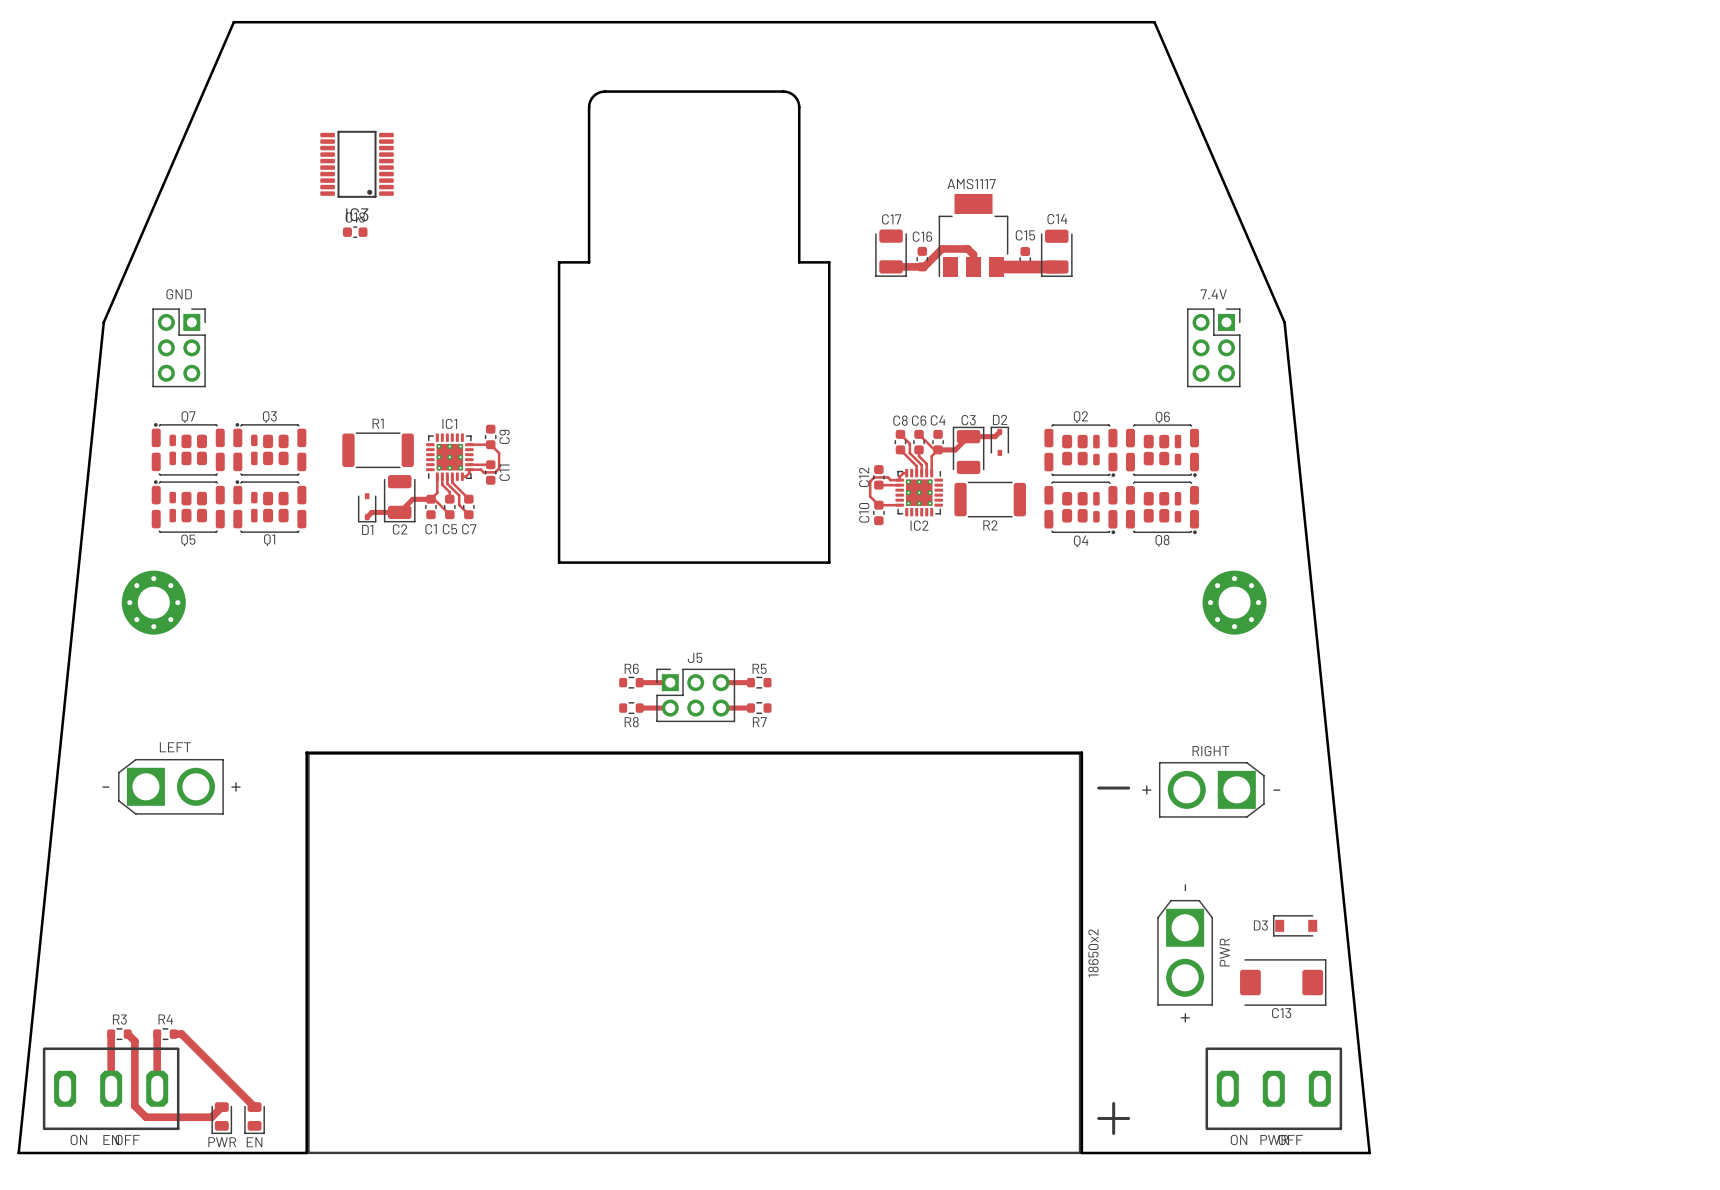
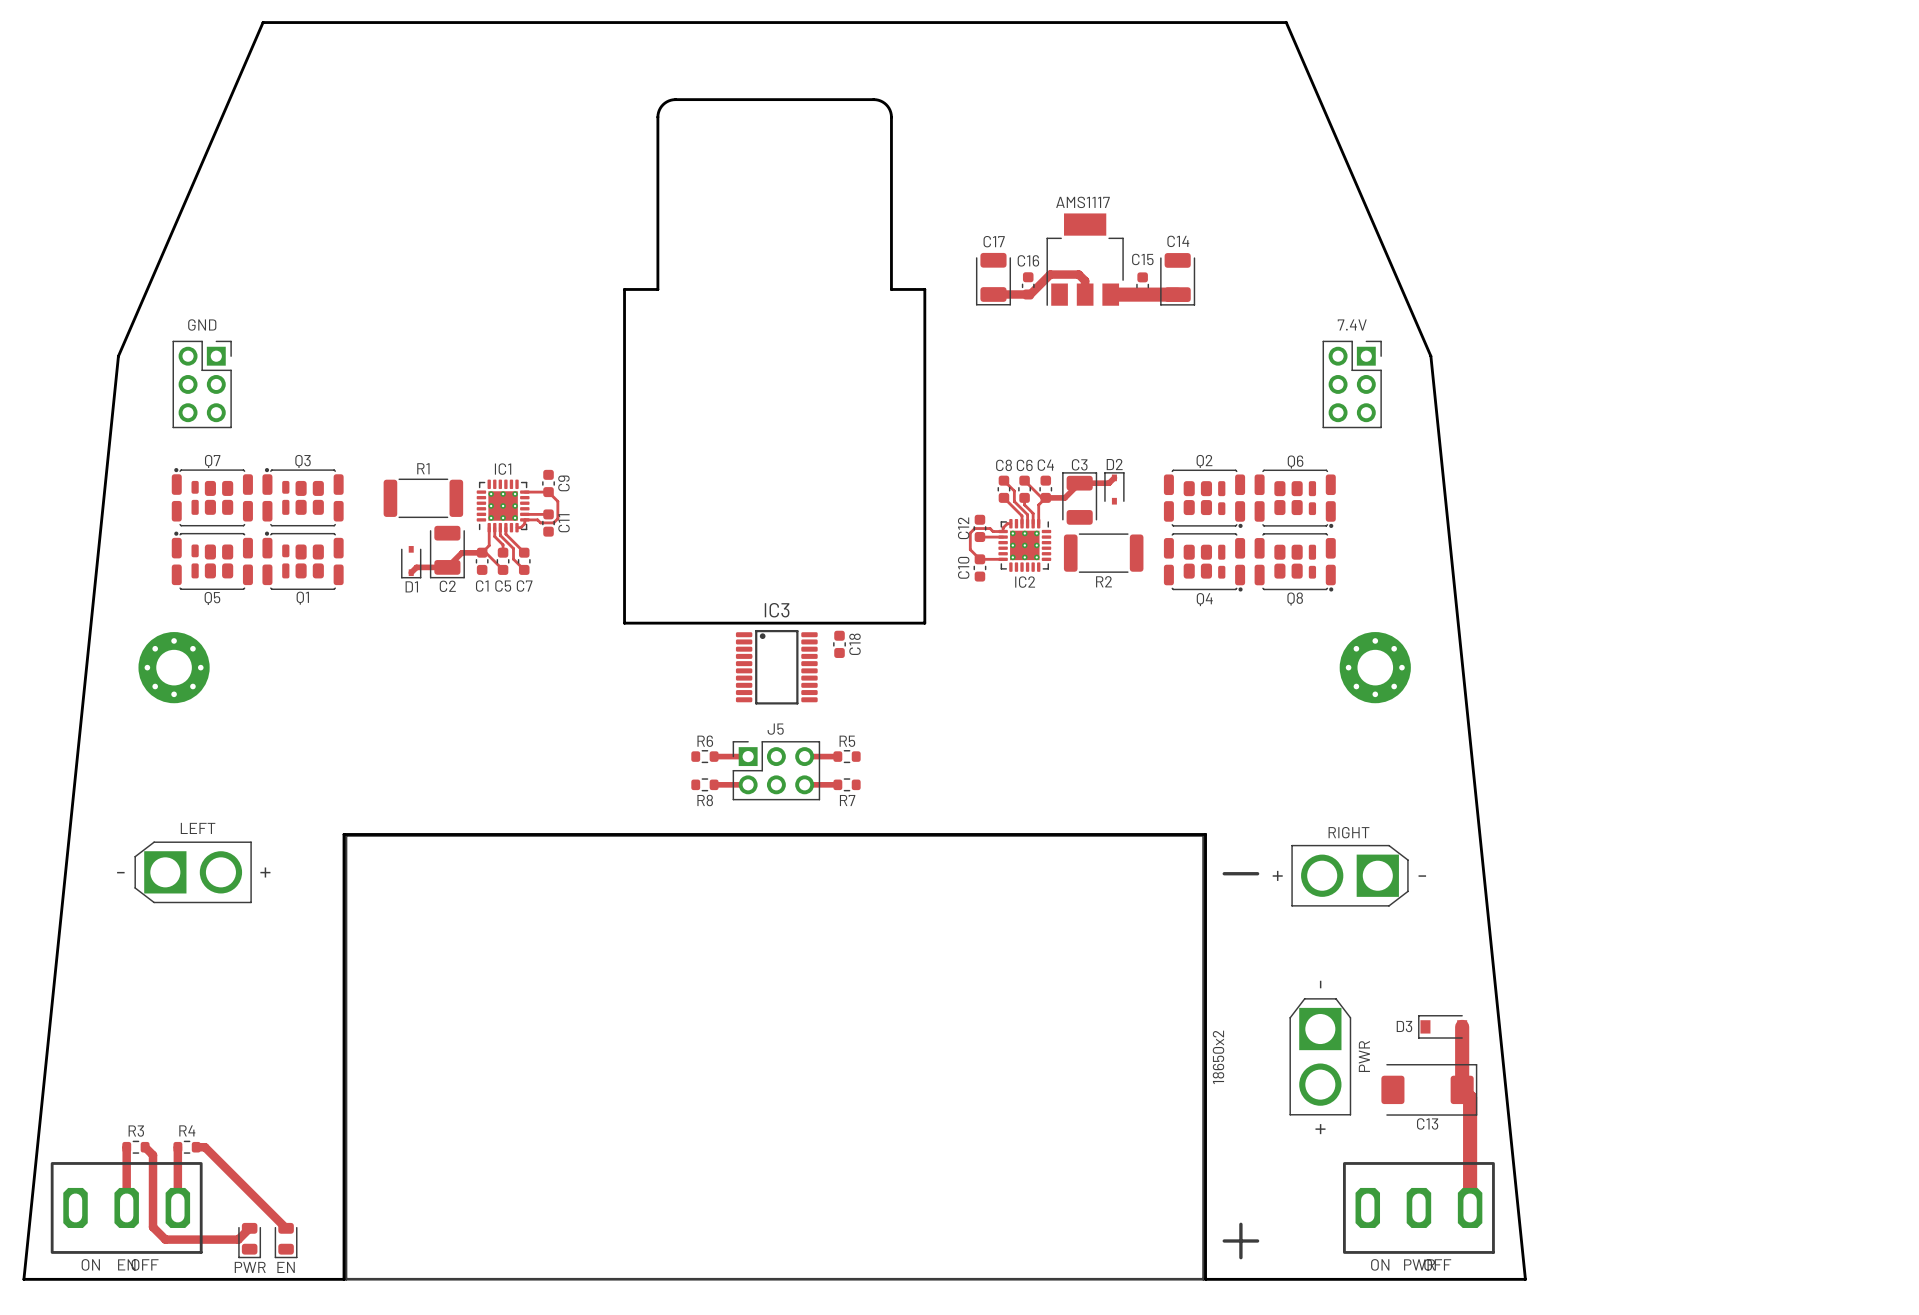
IC3 rotation: 0° (357, 164) -> 180° (776, 667)
IC3 position: (357, 164) -> (776, 667)
C18 rotation: 0° (355, 232) -> 90° clockwise (839, 644)
C18 position: (355, 232) -> (839, 644)
track: none -> (1462, 1026) (1462, 1089) (1470, 1097) (1470, 1207)

